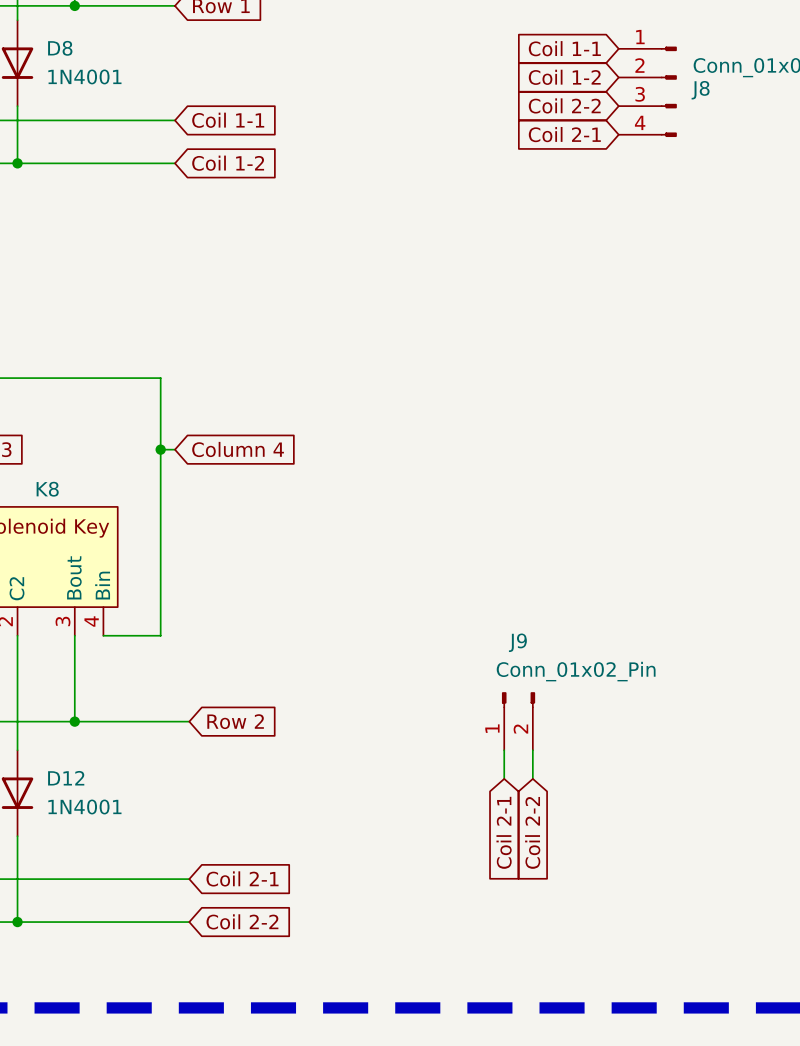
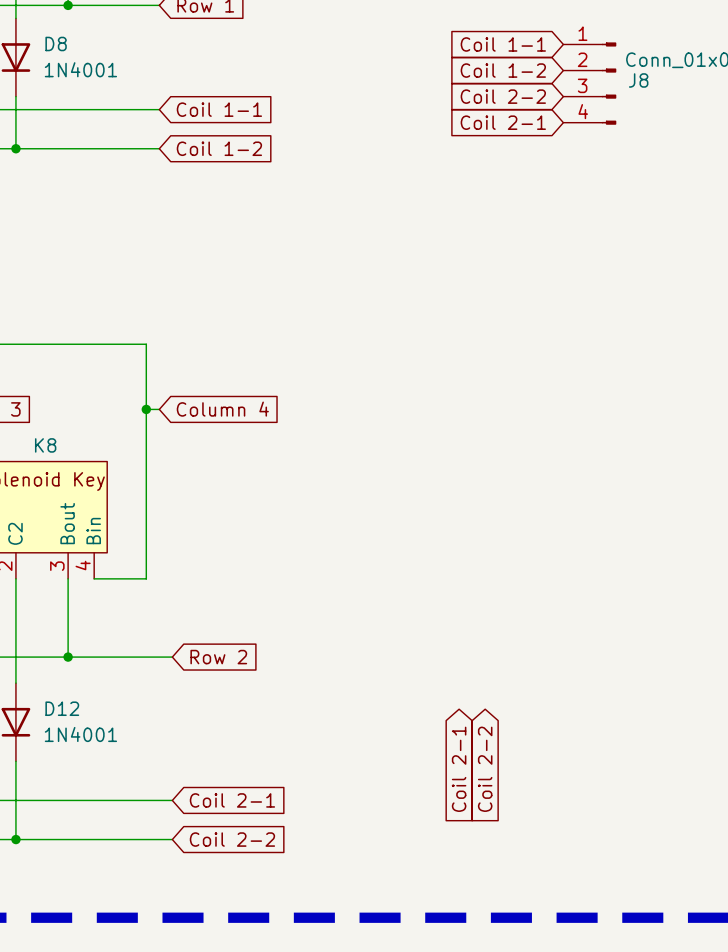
J9: Conn_01x02_Pin (518, 721) -> none
wire: (504, 750) (504, 778) -> none
wire: (532, 750) (532, 778) -> none

